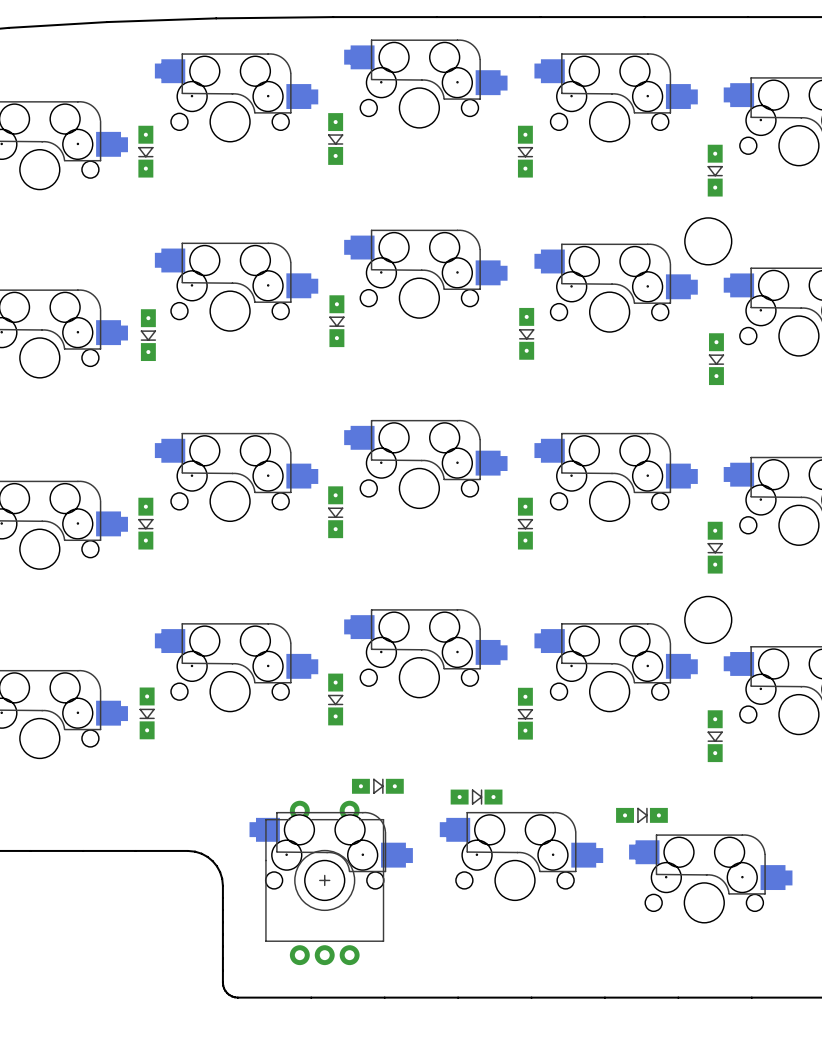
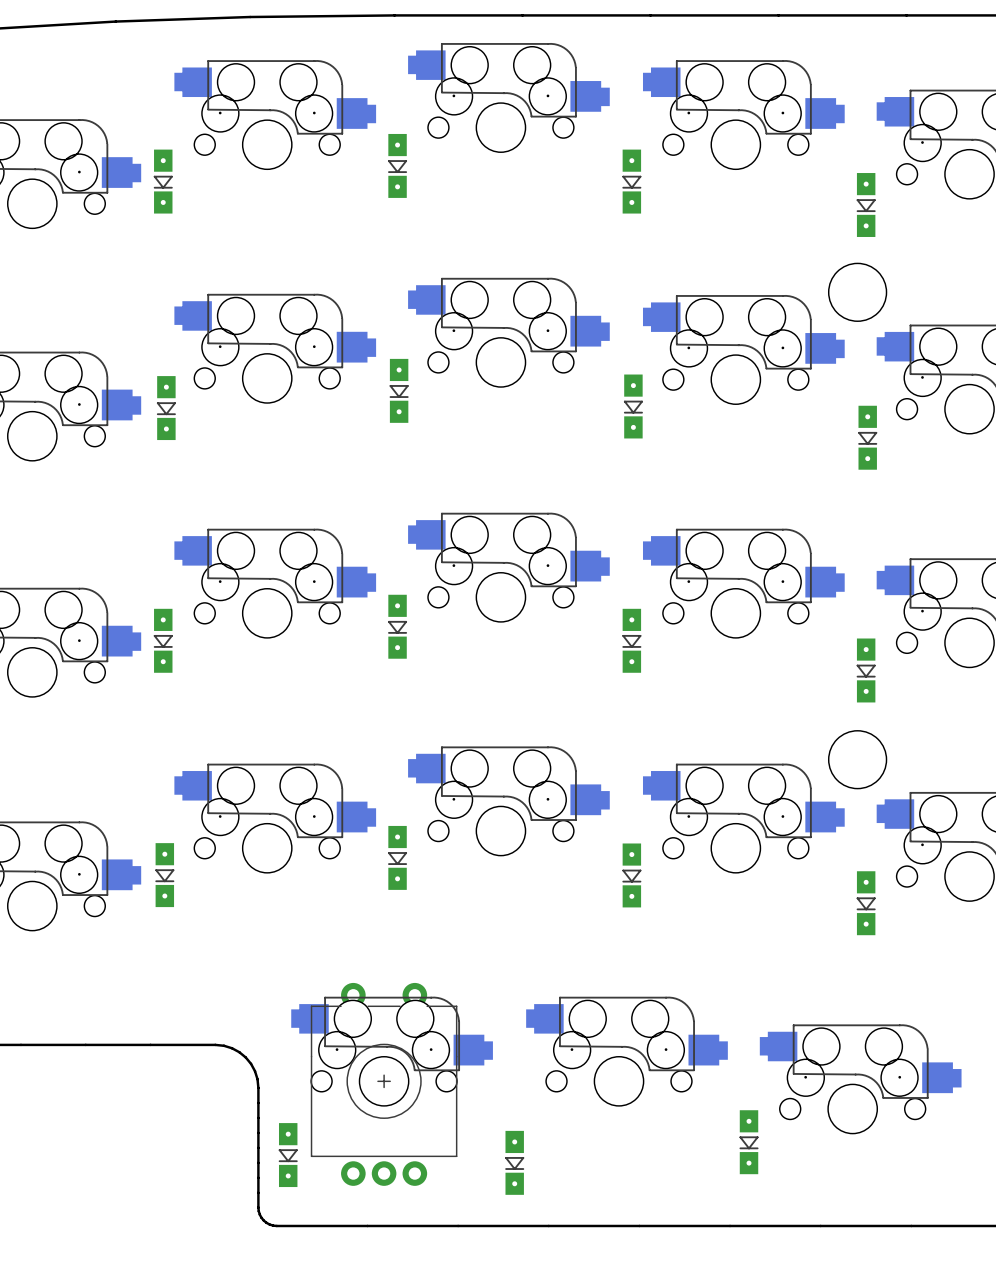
part: (377, 786) -> none
part: (476, 797) -> none
part: (641, 815) -> none
part: none -> (749, 1142)
part: none -> (288, 1155)
part: none -> (514, 1162)

